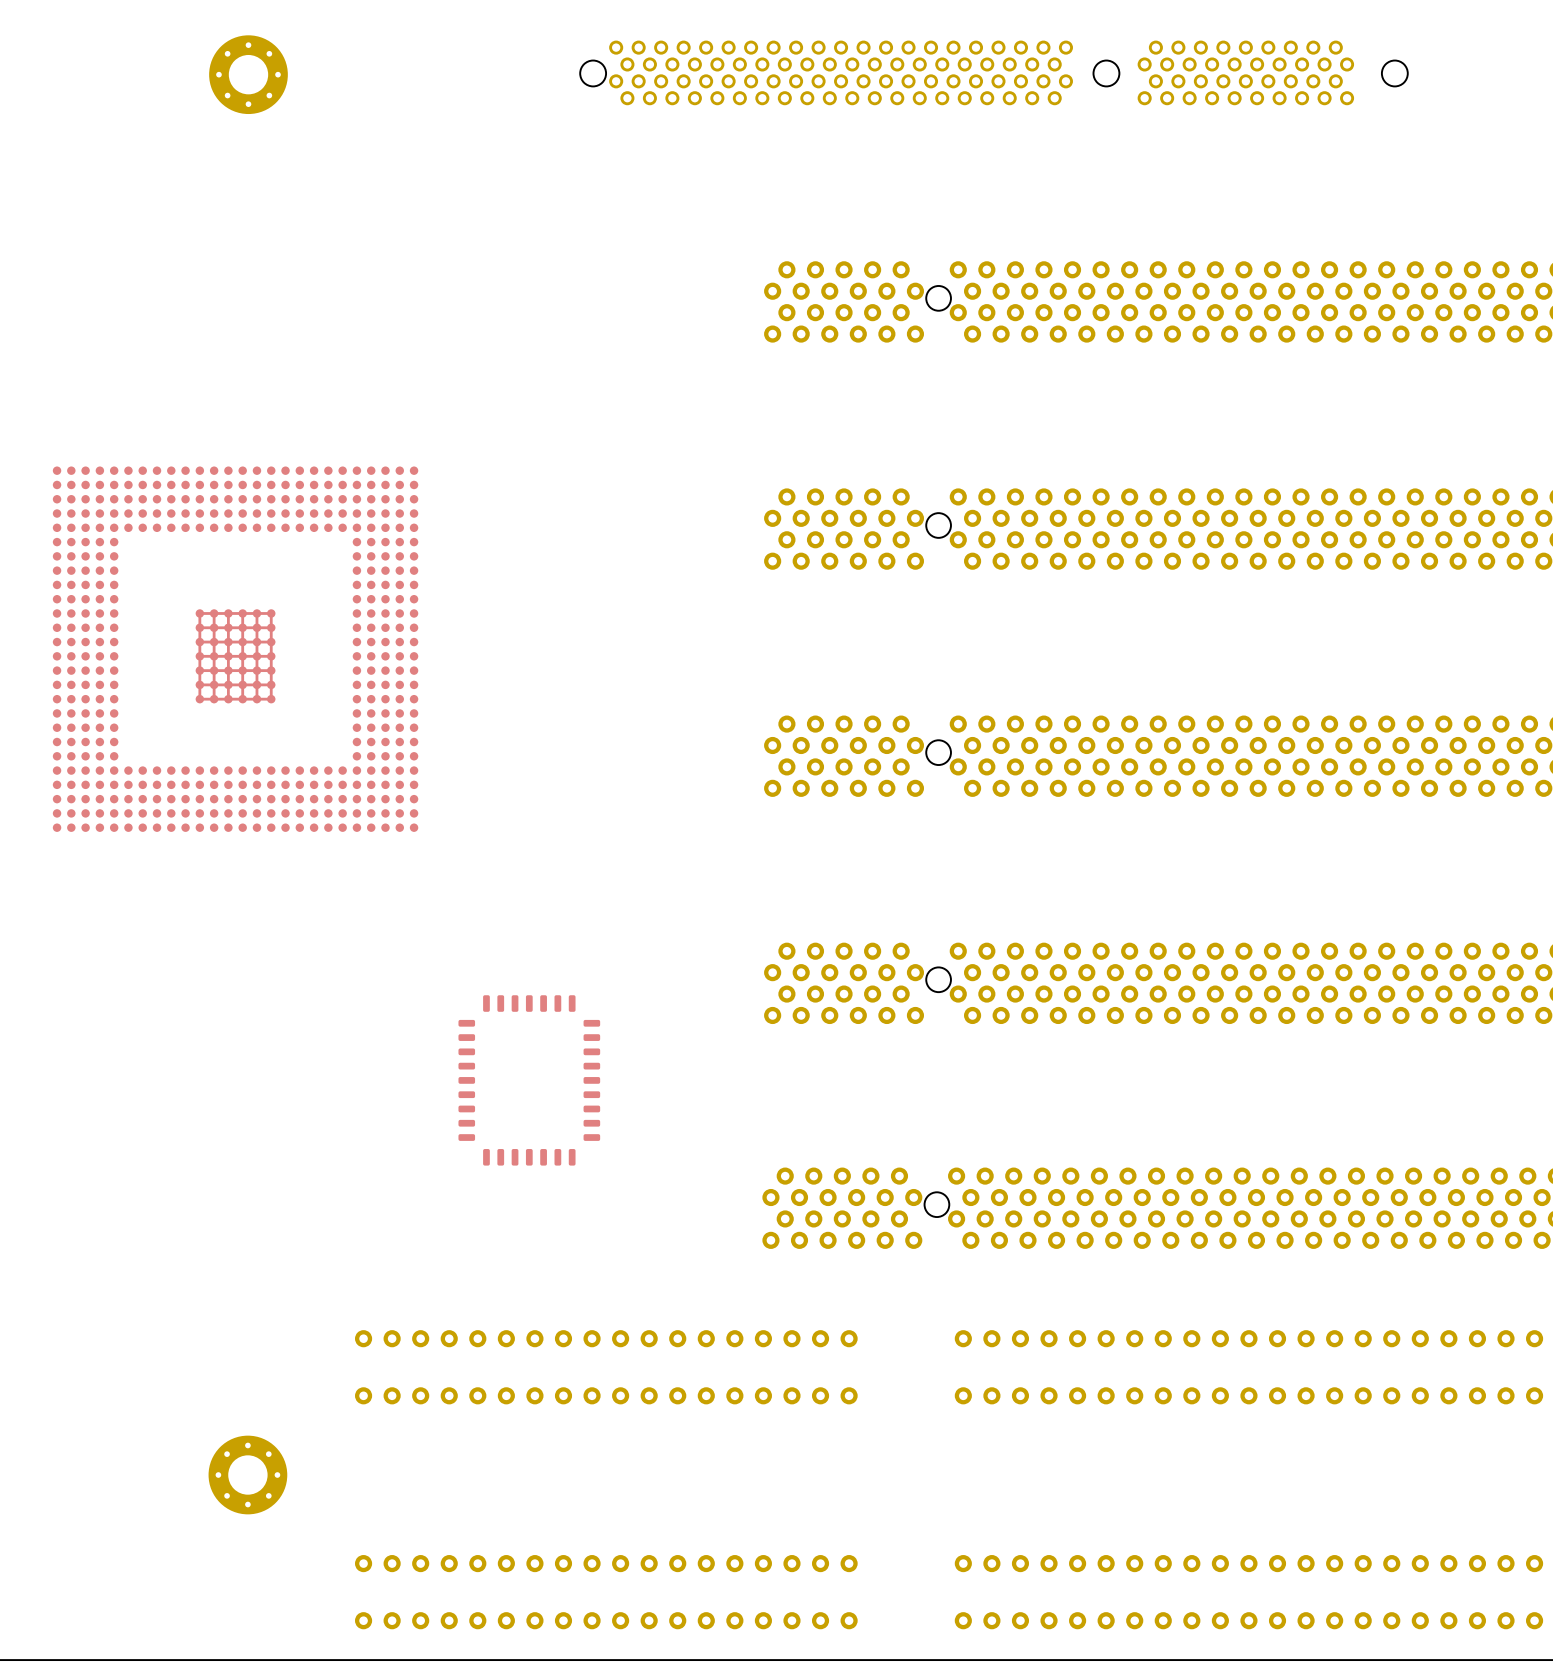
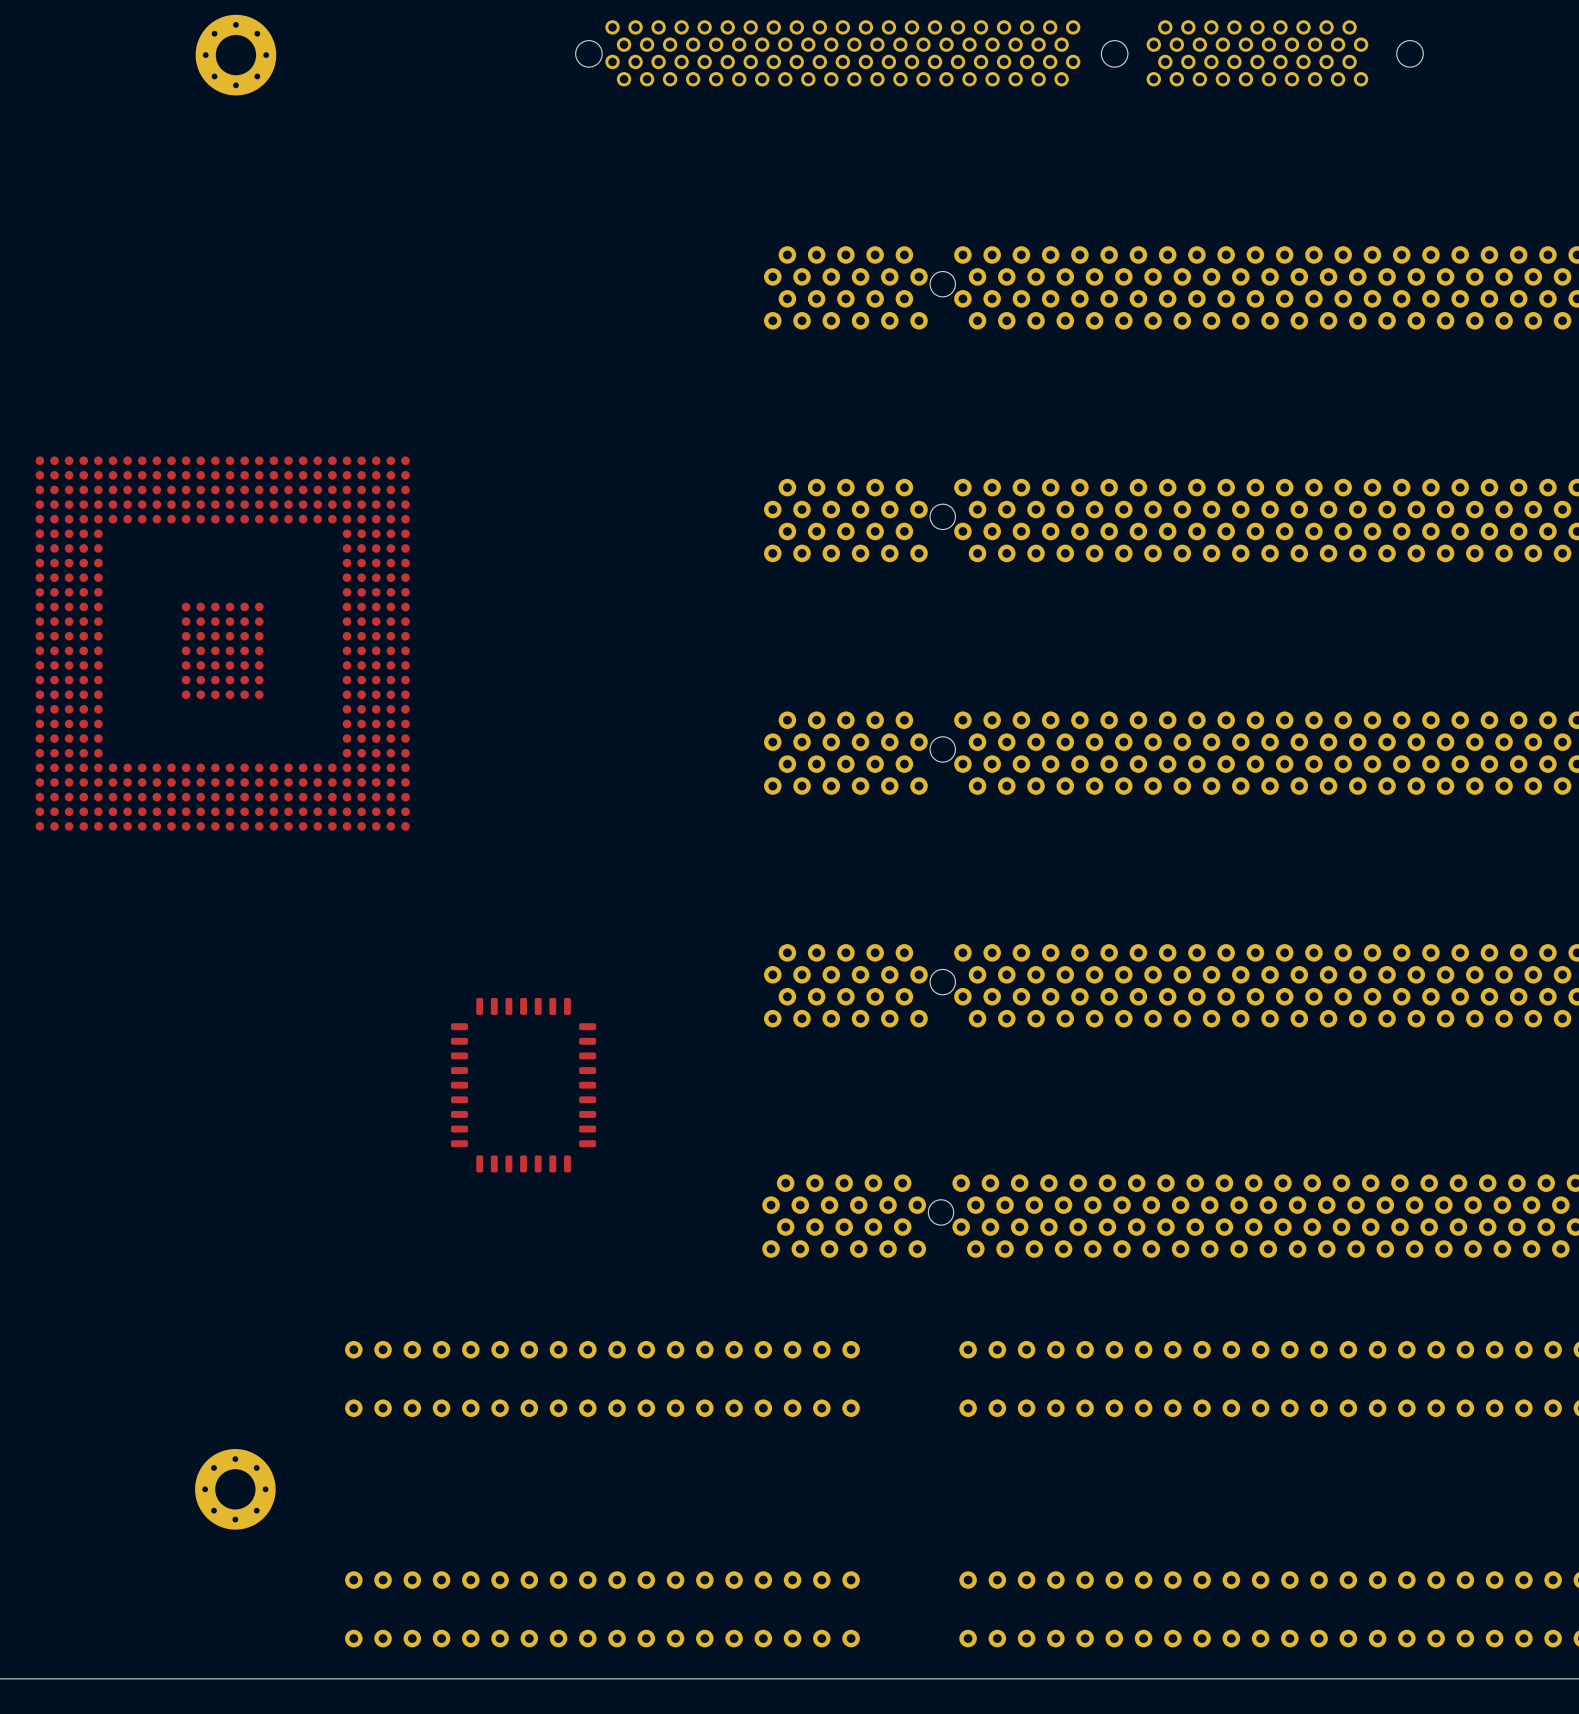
top track: (214, 613) (214, 699) -> none
top track: (228, 613) (228, 699) -> none
top track: (242, 613) (242, 699) -> none
top track: (256, 613) (256, 699) -> none
top track: (271, 613) (199, 613) (199, 699) (271, 699) (271, 613) -> none
top track: (271, 627) (199, 627) -> none
top track: (271, 642) (199, 642) -> none
top track: (271, 656) (199, 656) -> none
top track: (271, 670) (199, 670) -> none
top track: (271, 684) (199, 684) -> none

